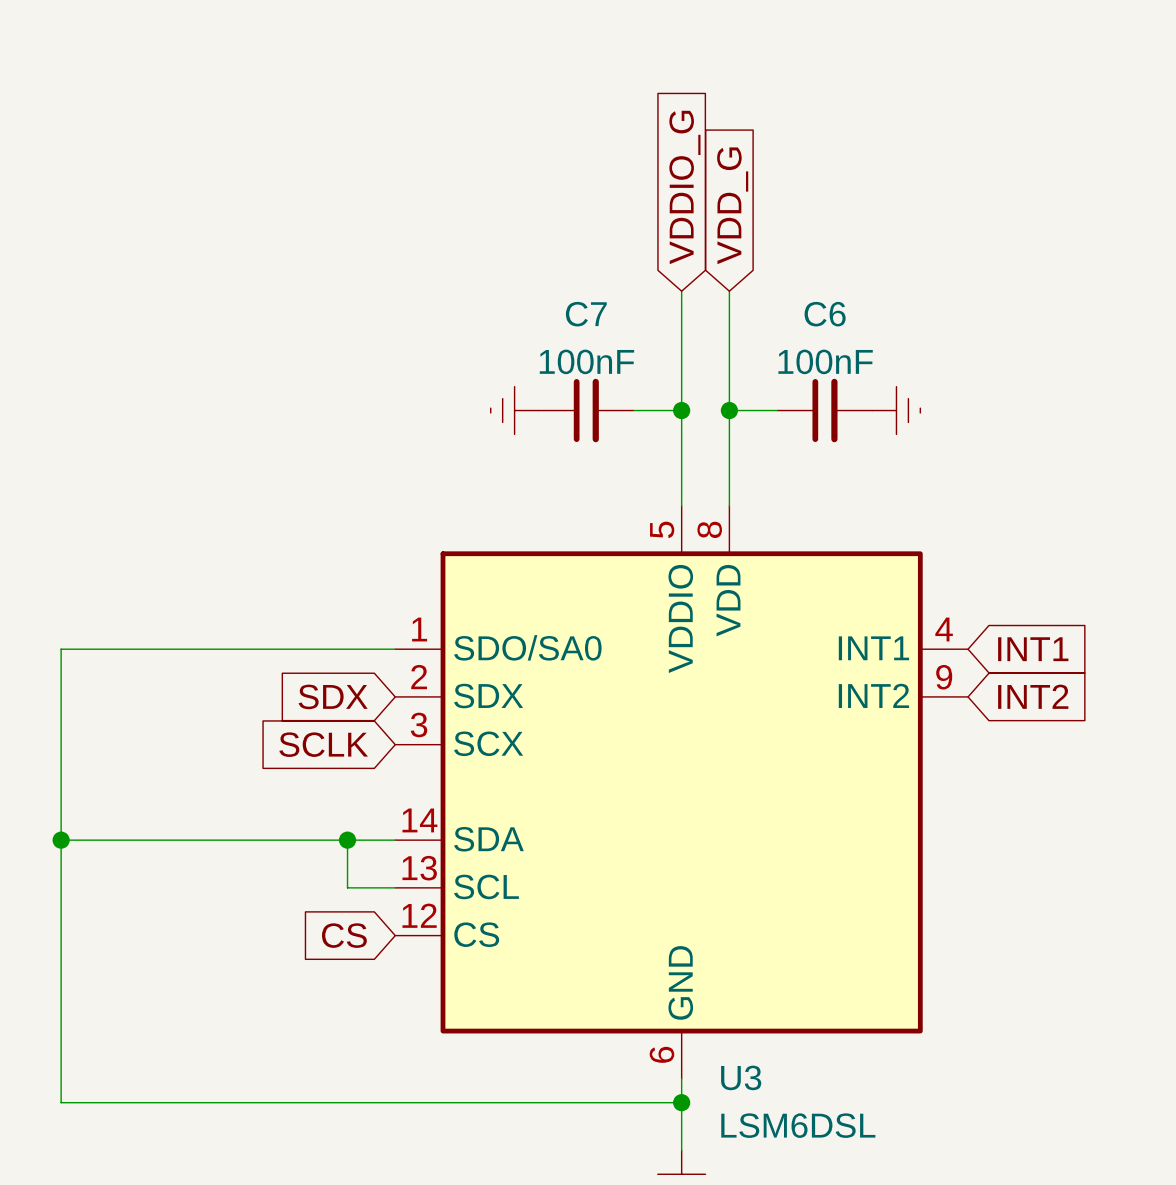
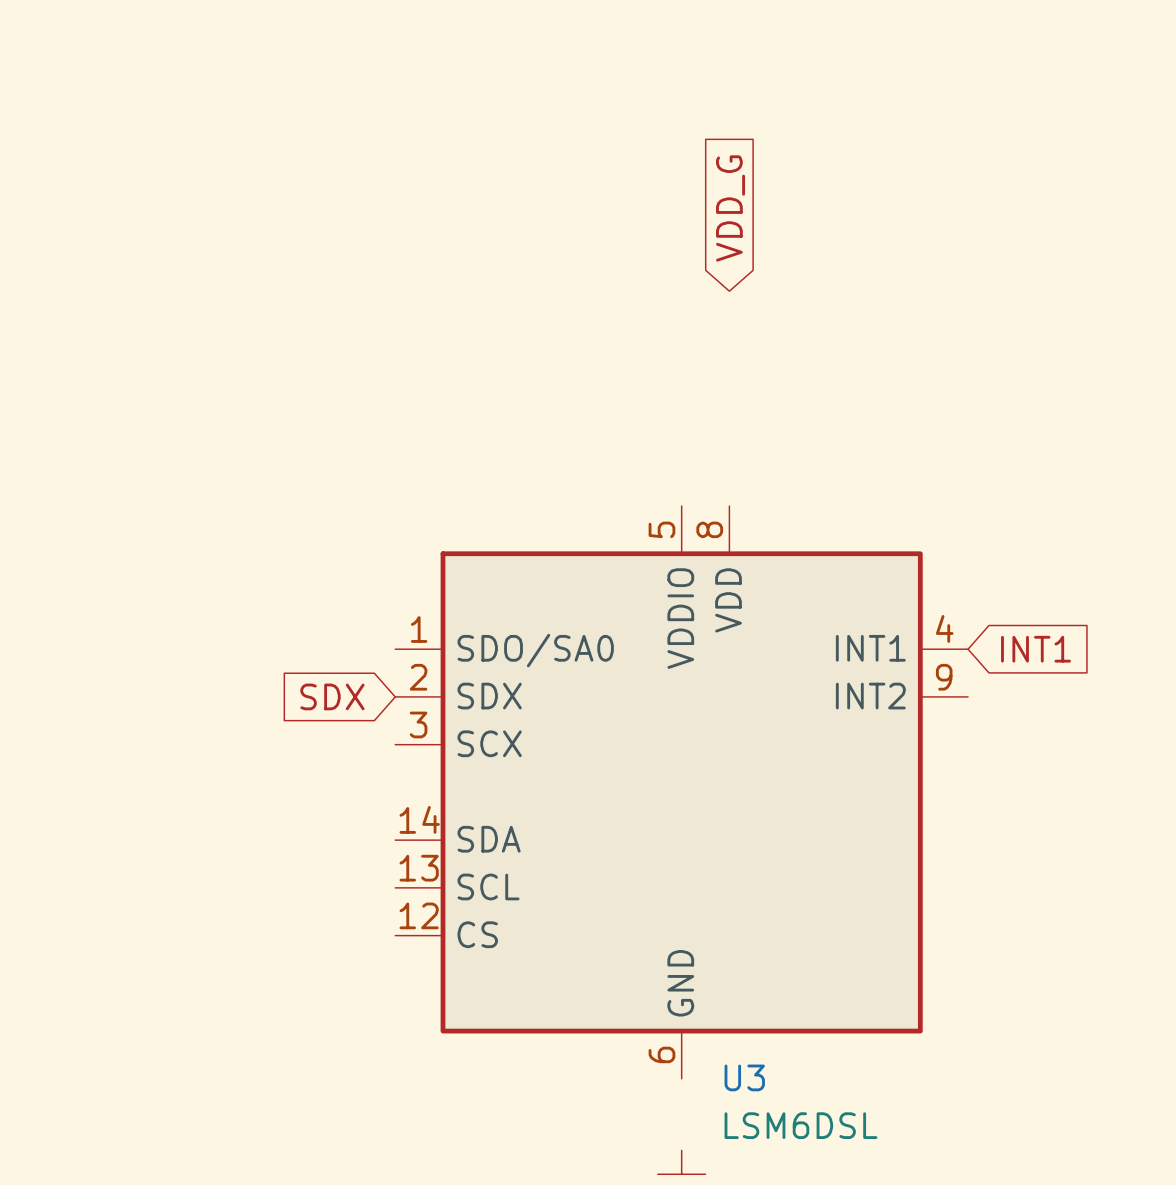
global label: VDDIO_G (684, 187) -> none
wire: (681, 291) (681, 506) -> none
wire: (729, 291) (729, 506) -> none
power symbol: (514, 410) -> none
C7: 100nF (586, 410) -> none
wire: (633, 410) (681, 410) -> none
junction: (681, 410) -> none
wire: (729, 410) (777, 410) -> none
junction: (729, 410) -> none
C6: 100nF (824, 410) -> none
power symbol: (896, 410) -> none
wire: (395, 649) (61, 649) (61, 1102) (681, 1102) -> none
global label: INT2 (1033, 696) -> none
global label: SCLK (323, 744) -> none
wire: (61, 840) (395, 840) -> none
junction: (61, 840) -> none
wire: (347, 840) (347, 887) (395, 887) -> none
junction: (347, 840) -> none
global label: CS (344, 935) -> none
wire: (681, 1078) (681, 1150) -> none
junction: (681, 1102) -> none

